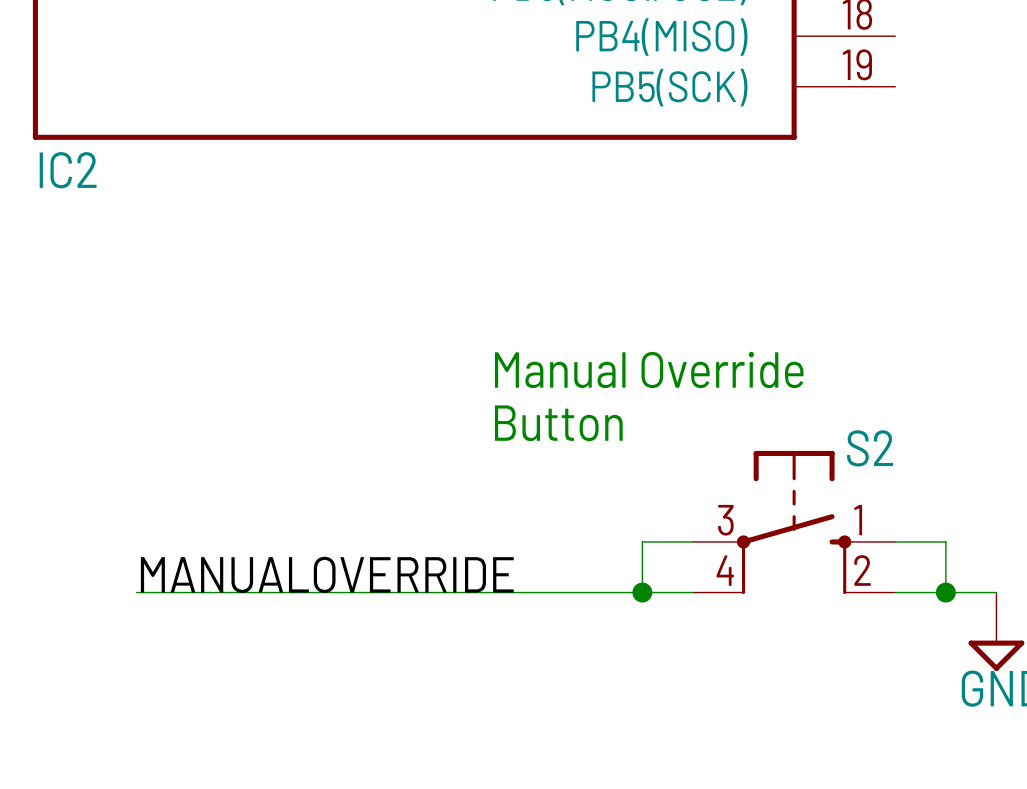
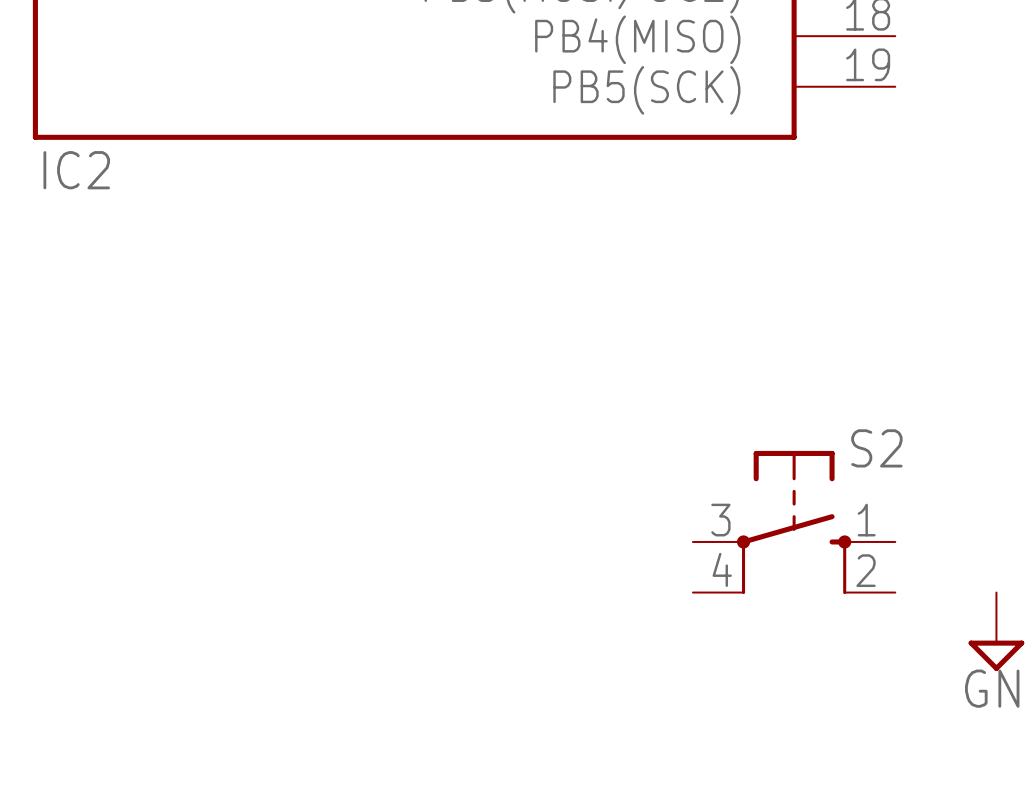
text: Manual Override (649, 369) -> none
text: Button (558, 423) -> none
wire: (692, 541) (642, 541) (642, 592) -> none
wire: (895, 541) (945, 541) (945, 592) -> none
label: MANUALOVERRIDE (327, 574) -> none
wire: (136, 592) (692, 592) -> none
junction: (642, 592) -> none
wire: (895, 592) (996, 592) -> none
junction: (945, 592) -> none

